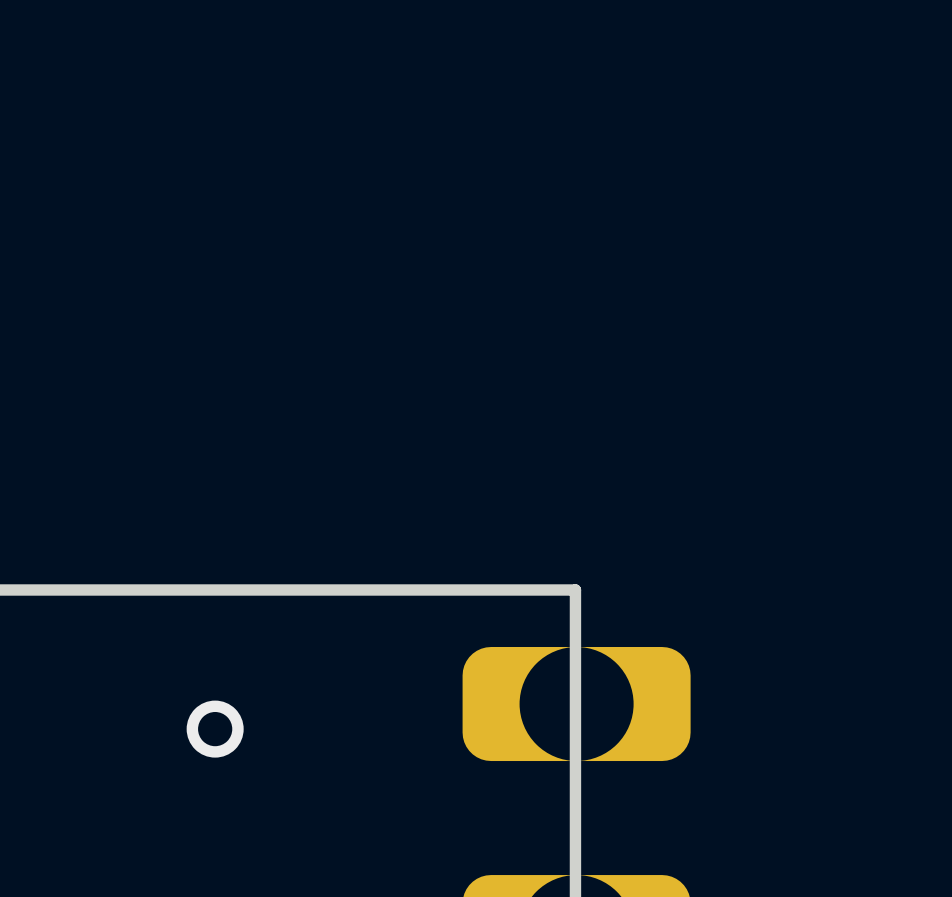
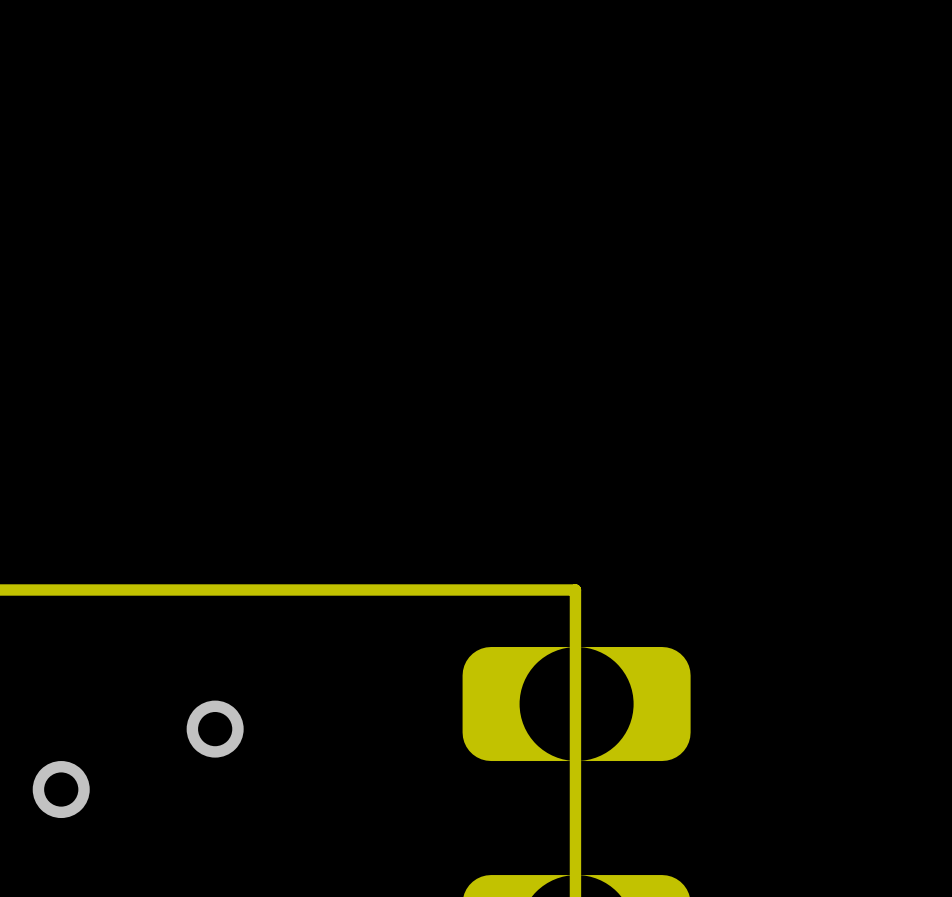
via: none -> (61, 789)

